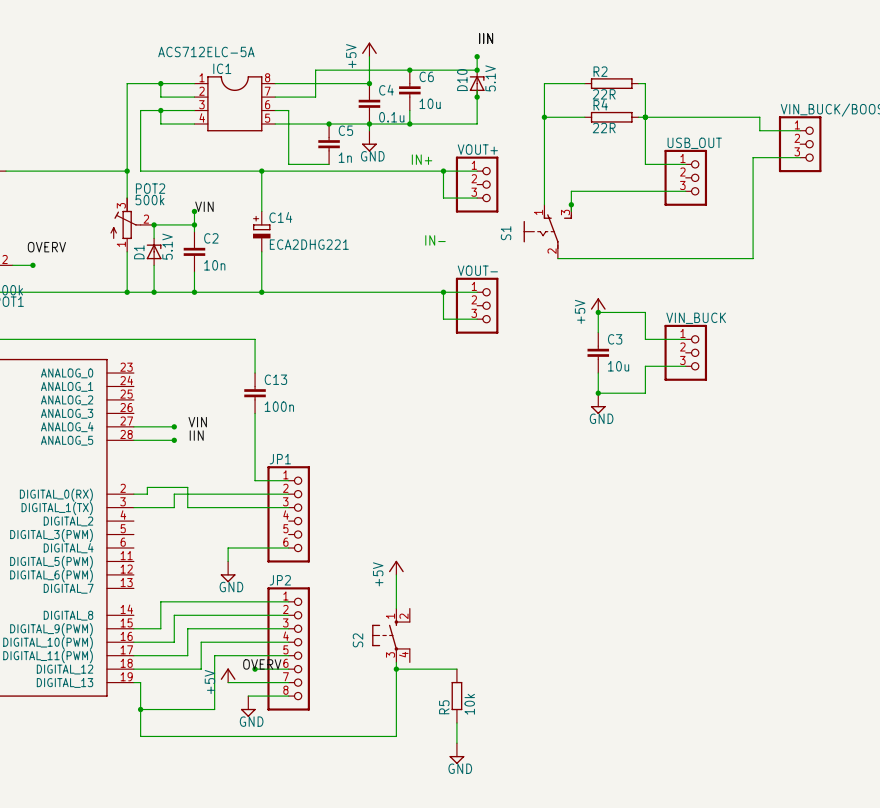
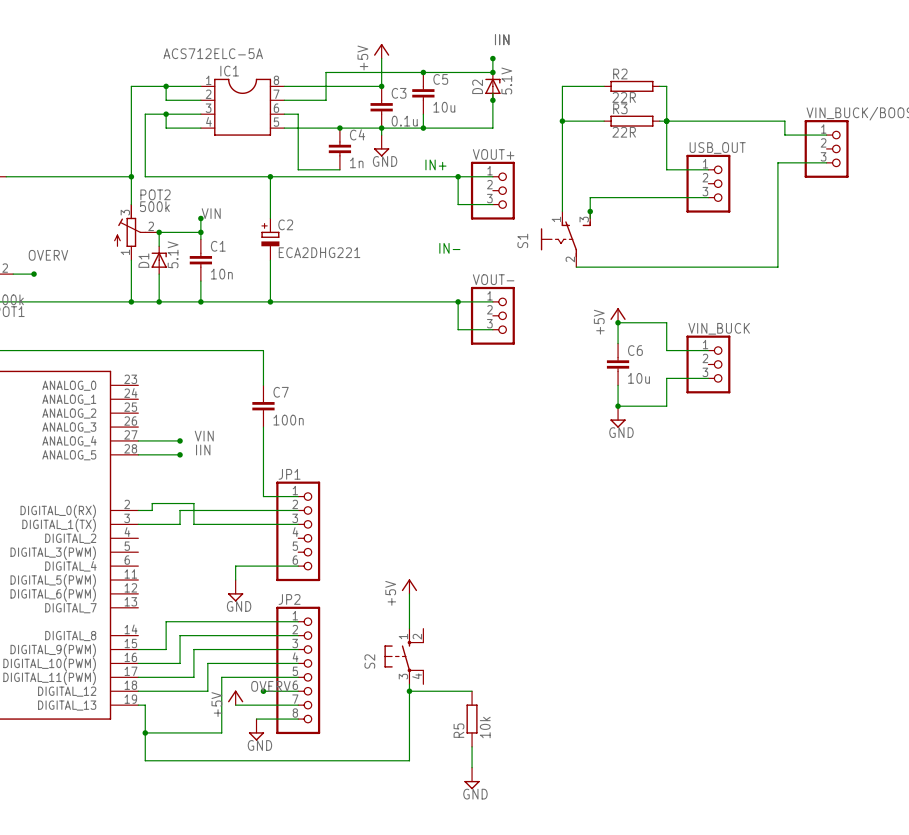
C6 name: C6 (426, 76) -> C5 (440, 79)
D10 name: D10 (462, 80) -> D2 (477, 86)
C4 name: C4 (386, 90) -> C3 (399, 93)
R4 name: R4 (600, 105) -> R3 (620, 108)
C5 name: C5 (345, 130) -> C4 (357, 134)
C14 name: C14 (280, 217) -> C2 (285, 224)
C2 name: C2 (211, 238) -> C1 (218, 246)
C3 name: C3 (615, 339) -> C6 (635, 350)
C13 name: C13 (275, 379) -> C7 (281, 392)

